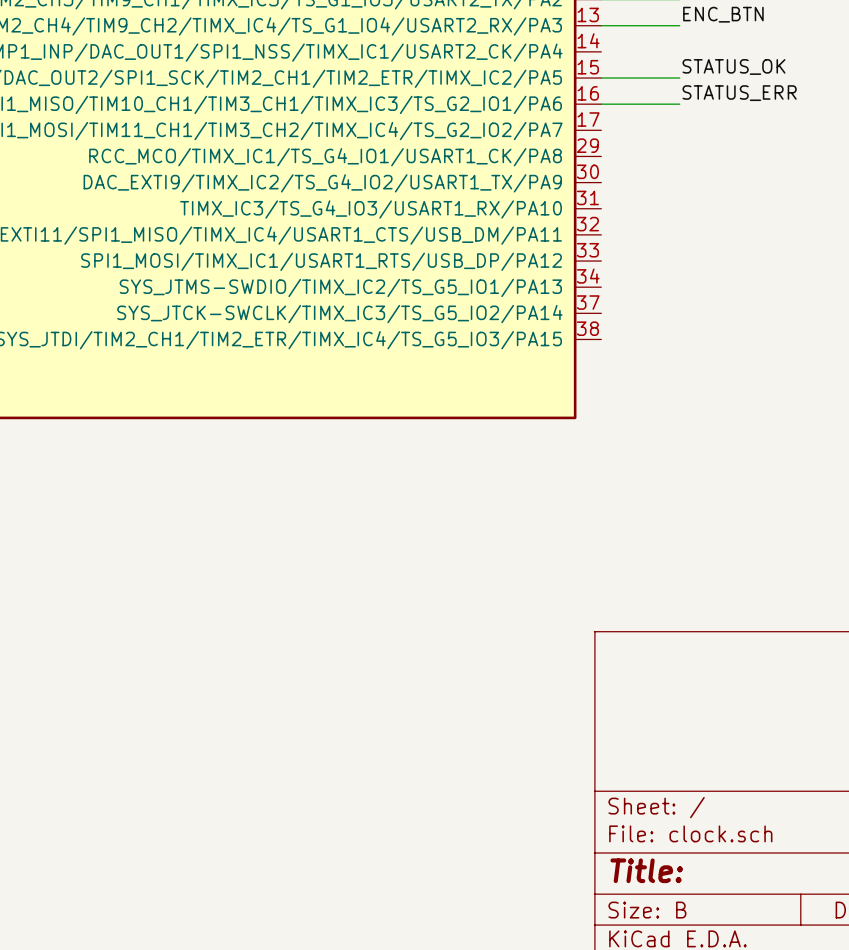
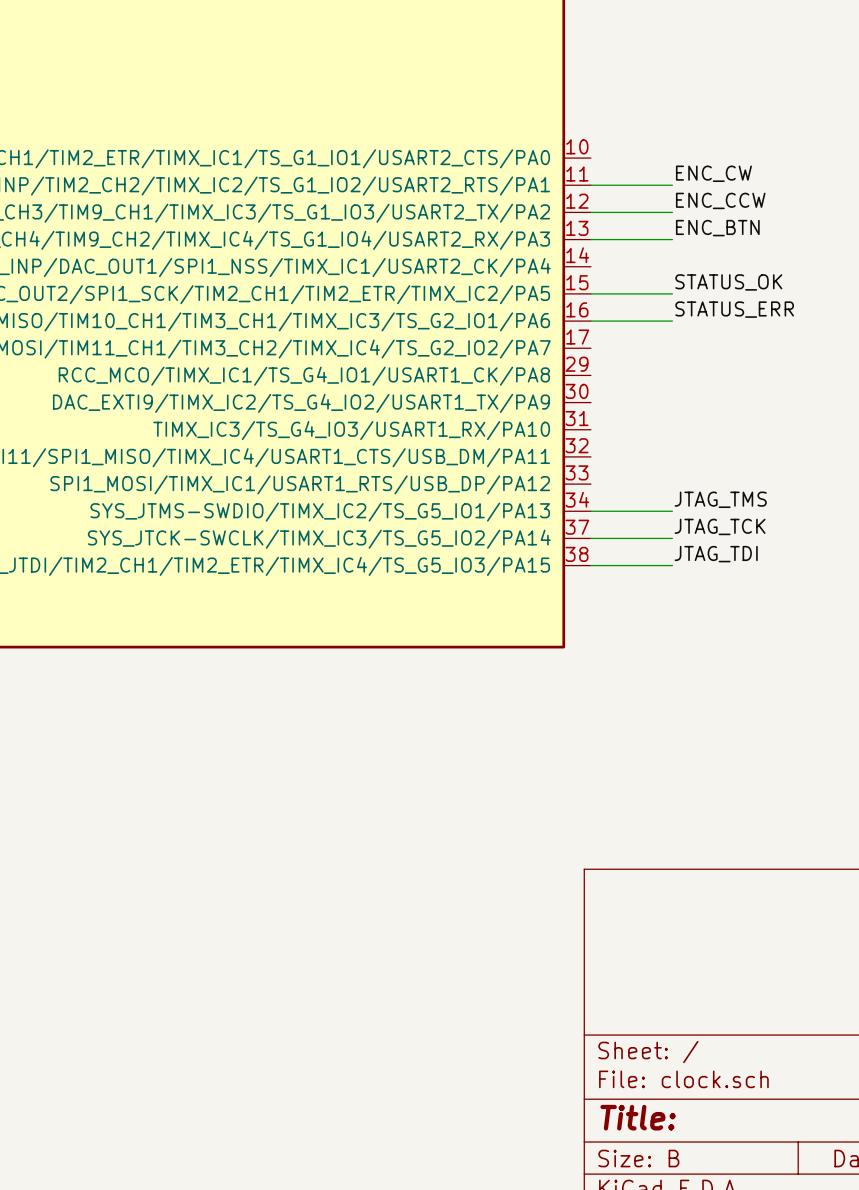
label: none -> JTAG_TMS (720, 499)
wire: none -> (590, 511) (672, 511)
label: none -> JTAG_TCK (720, 526)
wire: none -> (590, 538) (672, 538)
label: none -> JTAG_TDI (716, 554)
wire: none -> (590, 565) (672, 565)

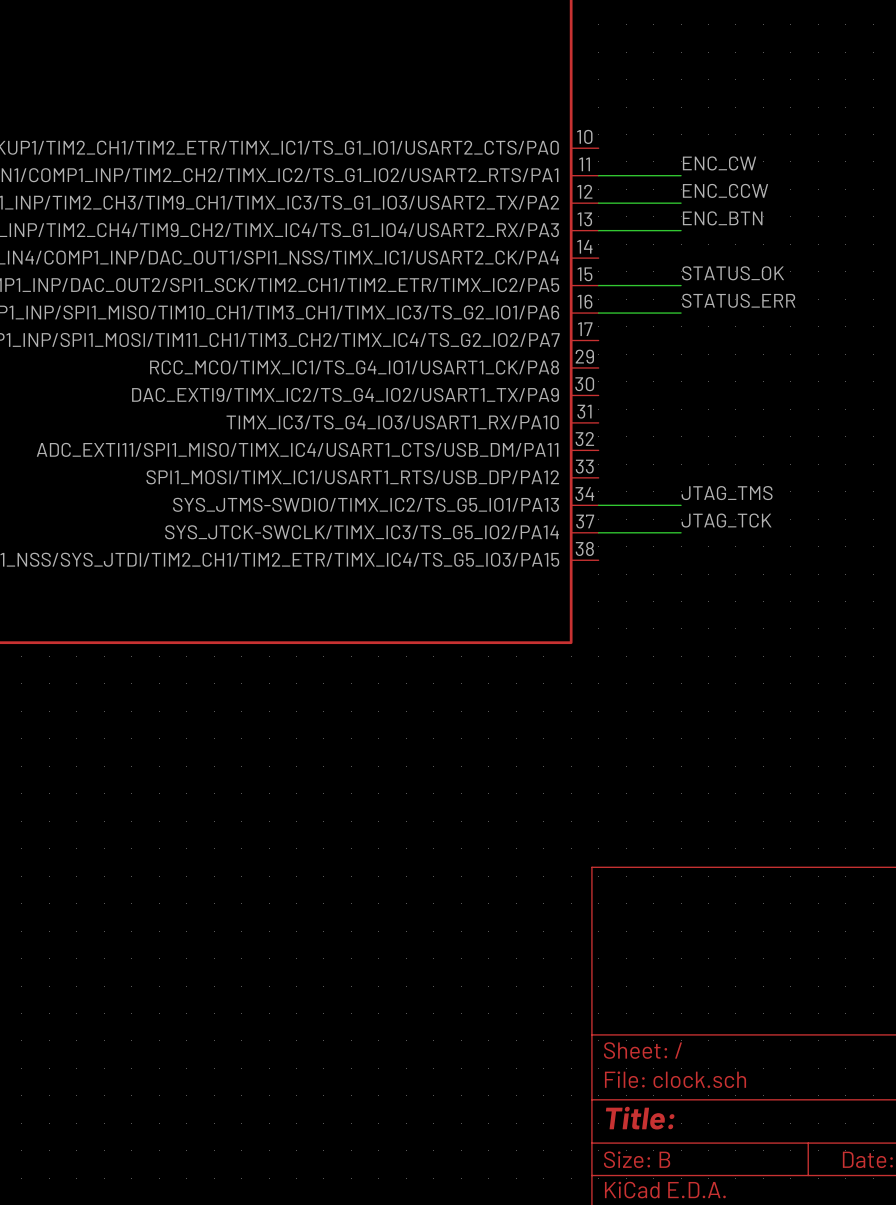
label: JTAG_TDI (716, 554) -> none
wire: (590, 565) (672, 565) -> none

